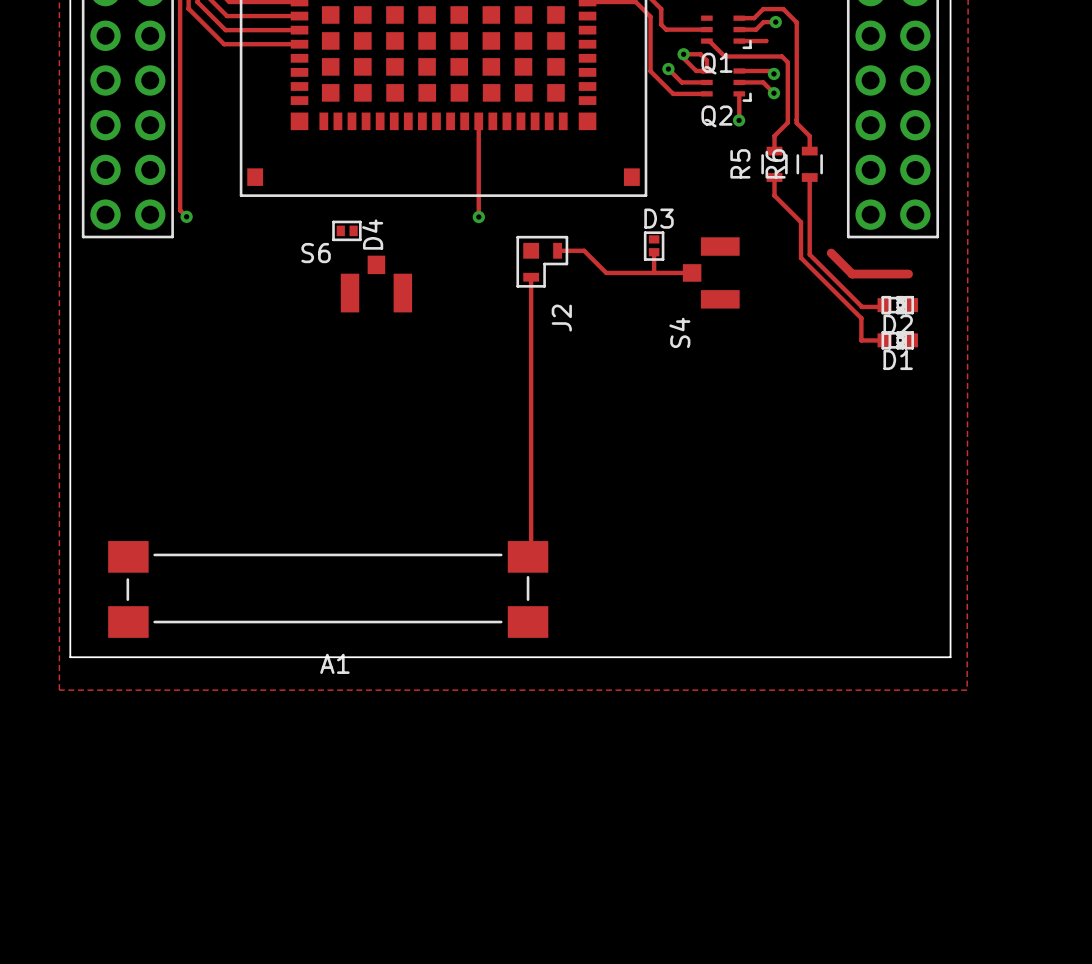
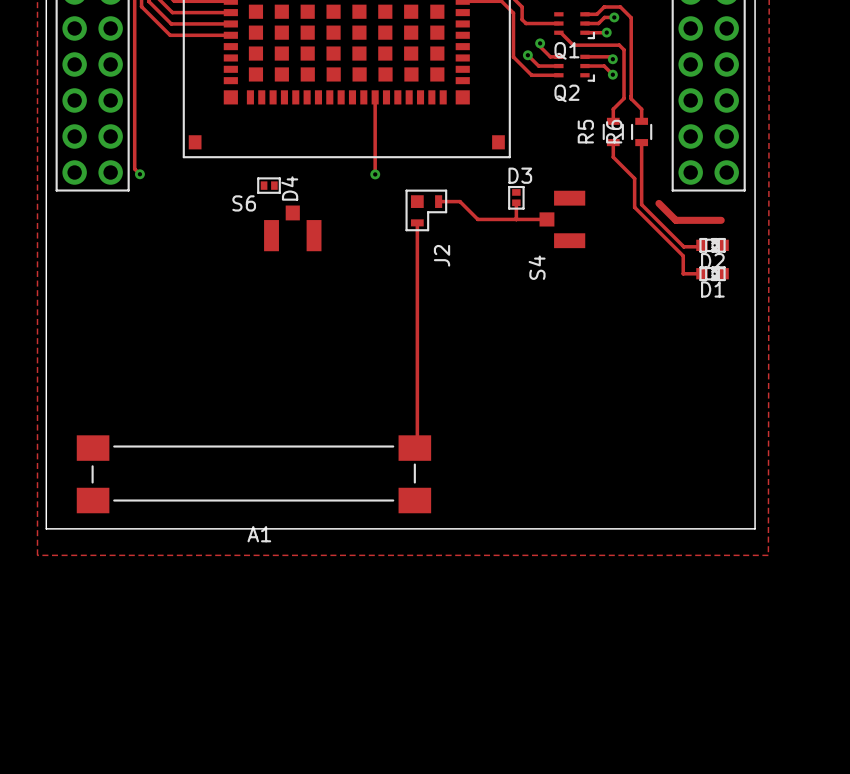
track: (683, 54) (700, 54) (706, 60) (706, 70) -> none
track: (739, 93) (739, 120) -> none
via position: (739, 120) -> (606, 32)

